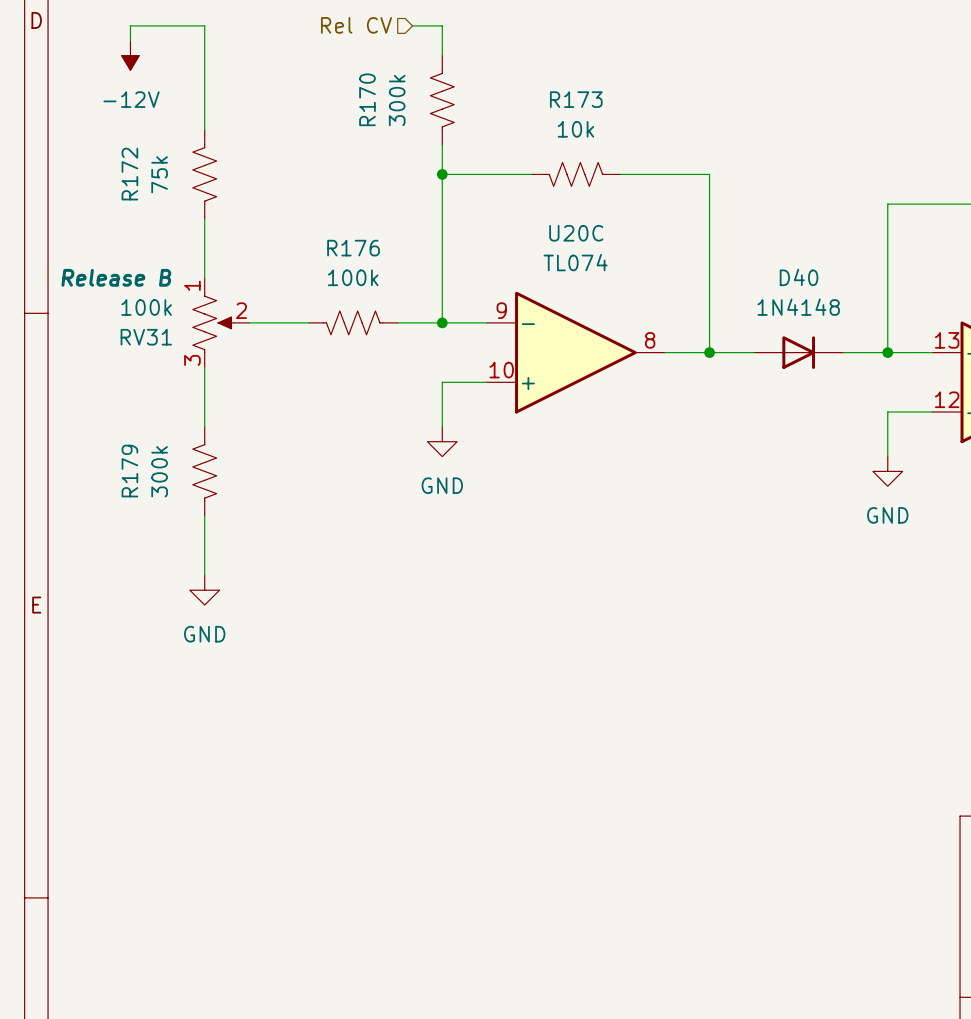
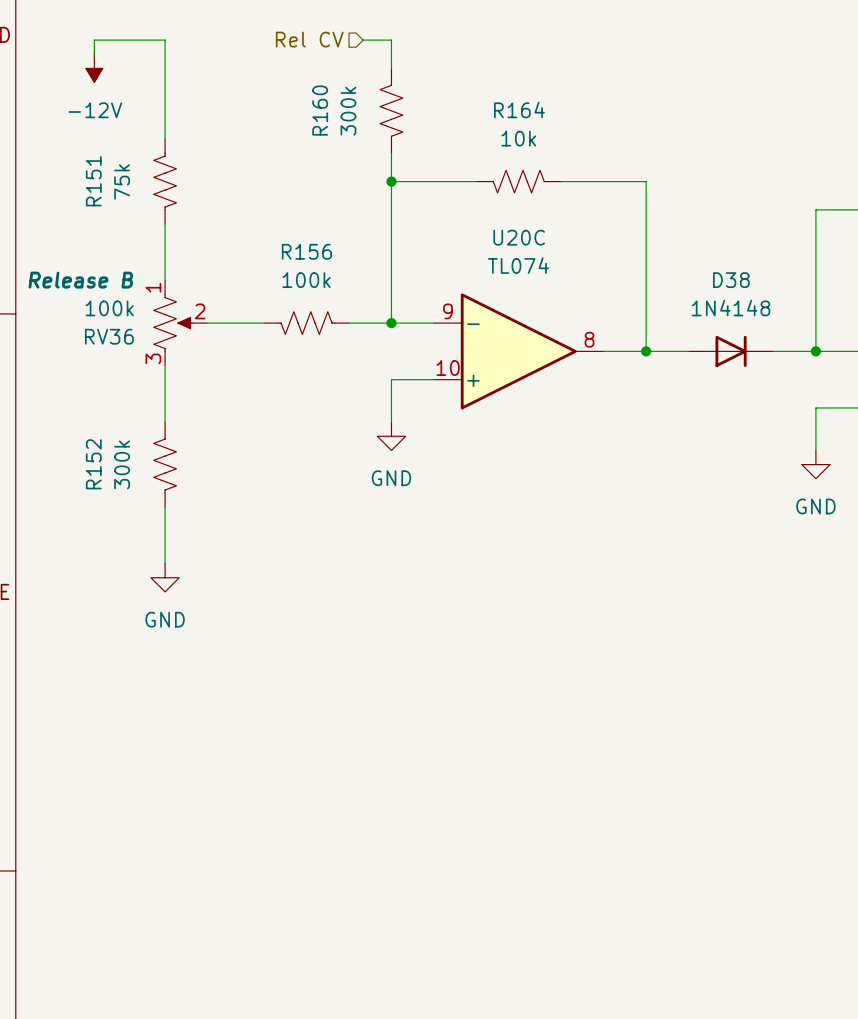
R170 name: R170 (367, 99) -> R160 (320, 110)
R173 name: R173 (576, 99) -> R164 (519, 109)
R172 name: R172 (129, 174) -> R151 (93, 181)
R176 name: R176 (353, 248) -> R156 (306, 251)
D40 name: D40 (799, 277) -> D38 (731, 280)
RV31 name: RV31 (146, 337) -> RV36 (109, 336)
R179 name: R179 (129, 471) -> R152 (93, 464)

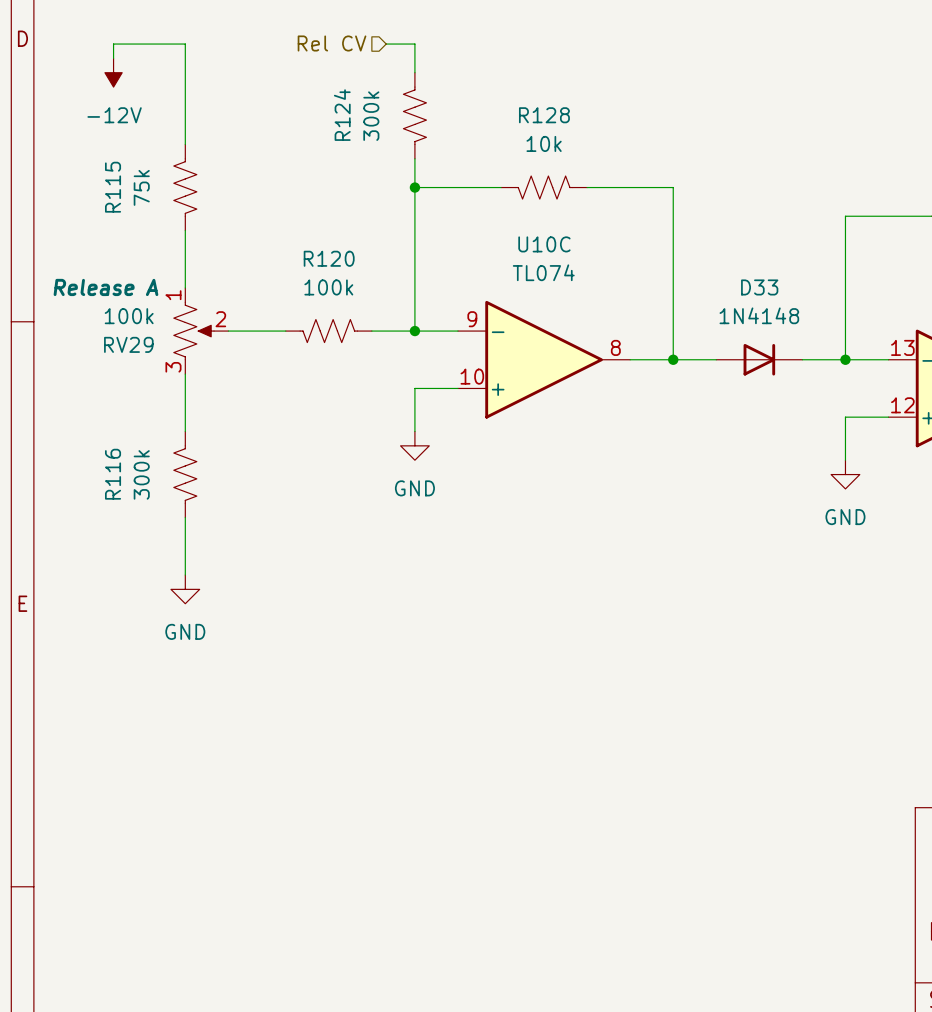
R164 name: R164 (519, 109) -> R128 (544, 115)
R160 name: R160 (320, 110) -> R124 (342, 115)
R151 name: R151 (93, 181) -> R115 (113, 187)
U20C name: U20C (519, 237) -> U10C (544, 244)
R156 name: R156 (306, 251) -> R120 (329, 258)
RV36 text: Release B (80, 280) -> Release A (105, 287)
D38 name: D38 (731, 280) -> D33 (759, 287)
RV36 name: RV36 (109, 336) -> RV29 (128, 344)
R152 name: R152 (93, 464) -> R116 (113, 474)

